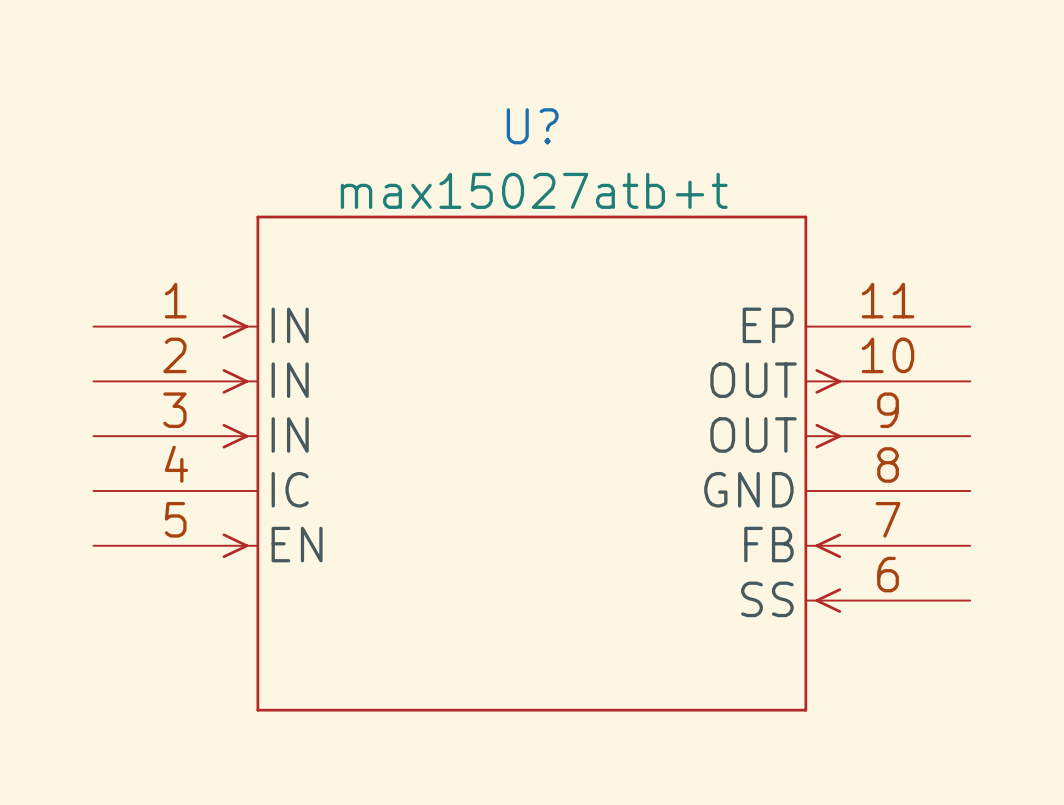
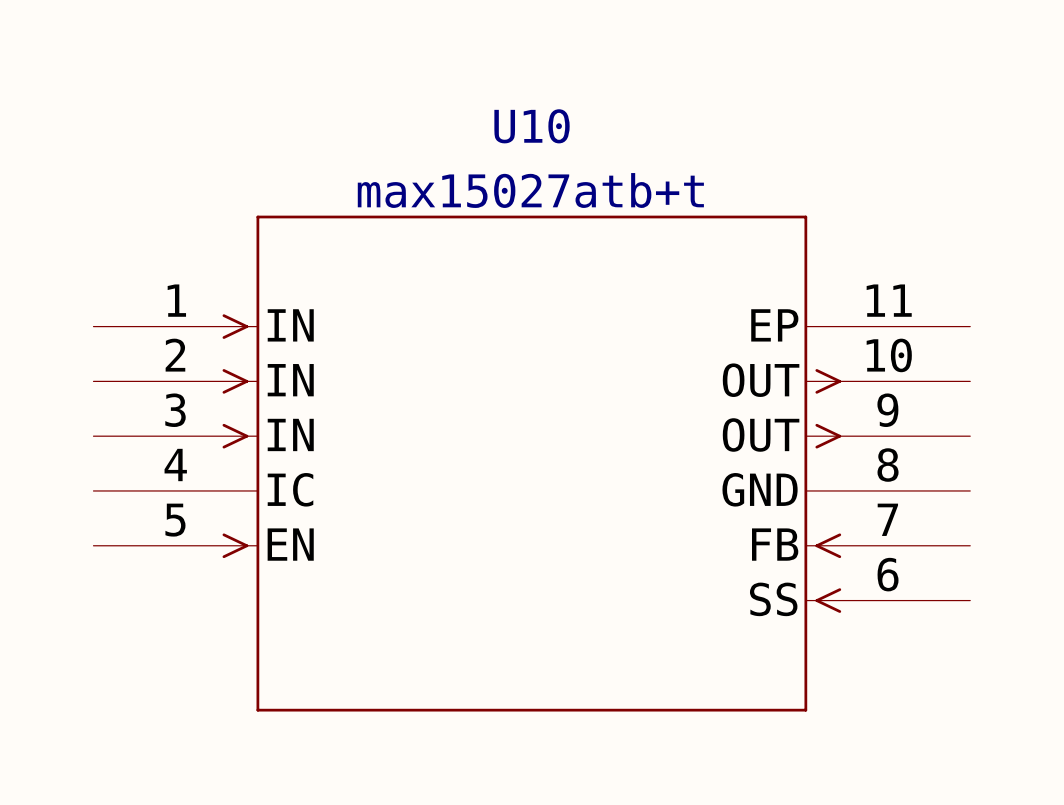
U? name: U? (532, 126) -> U10 (532, 126)

